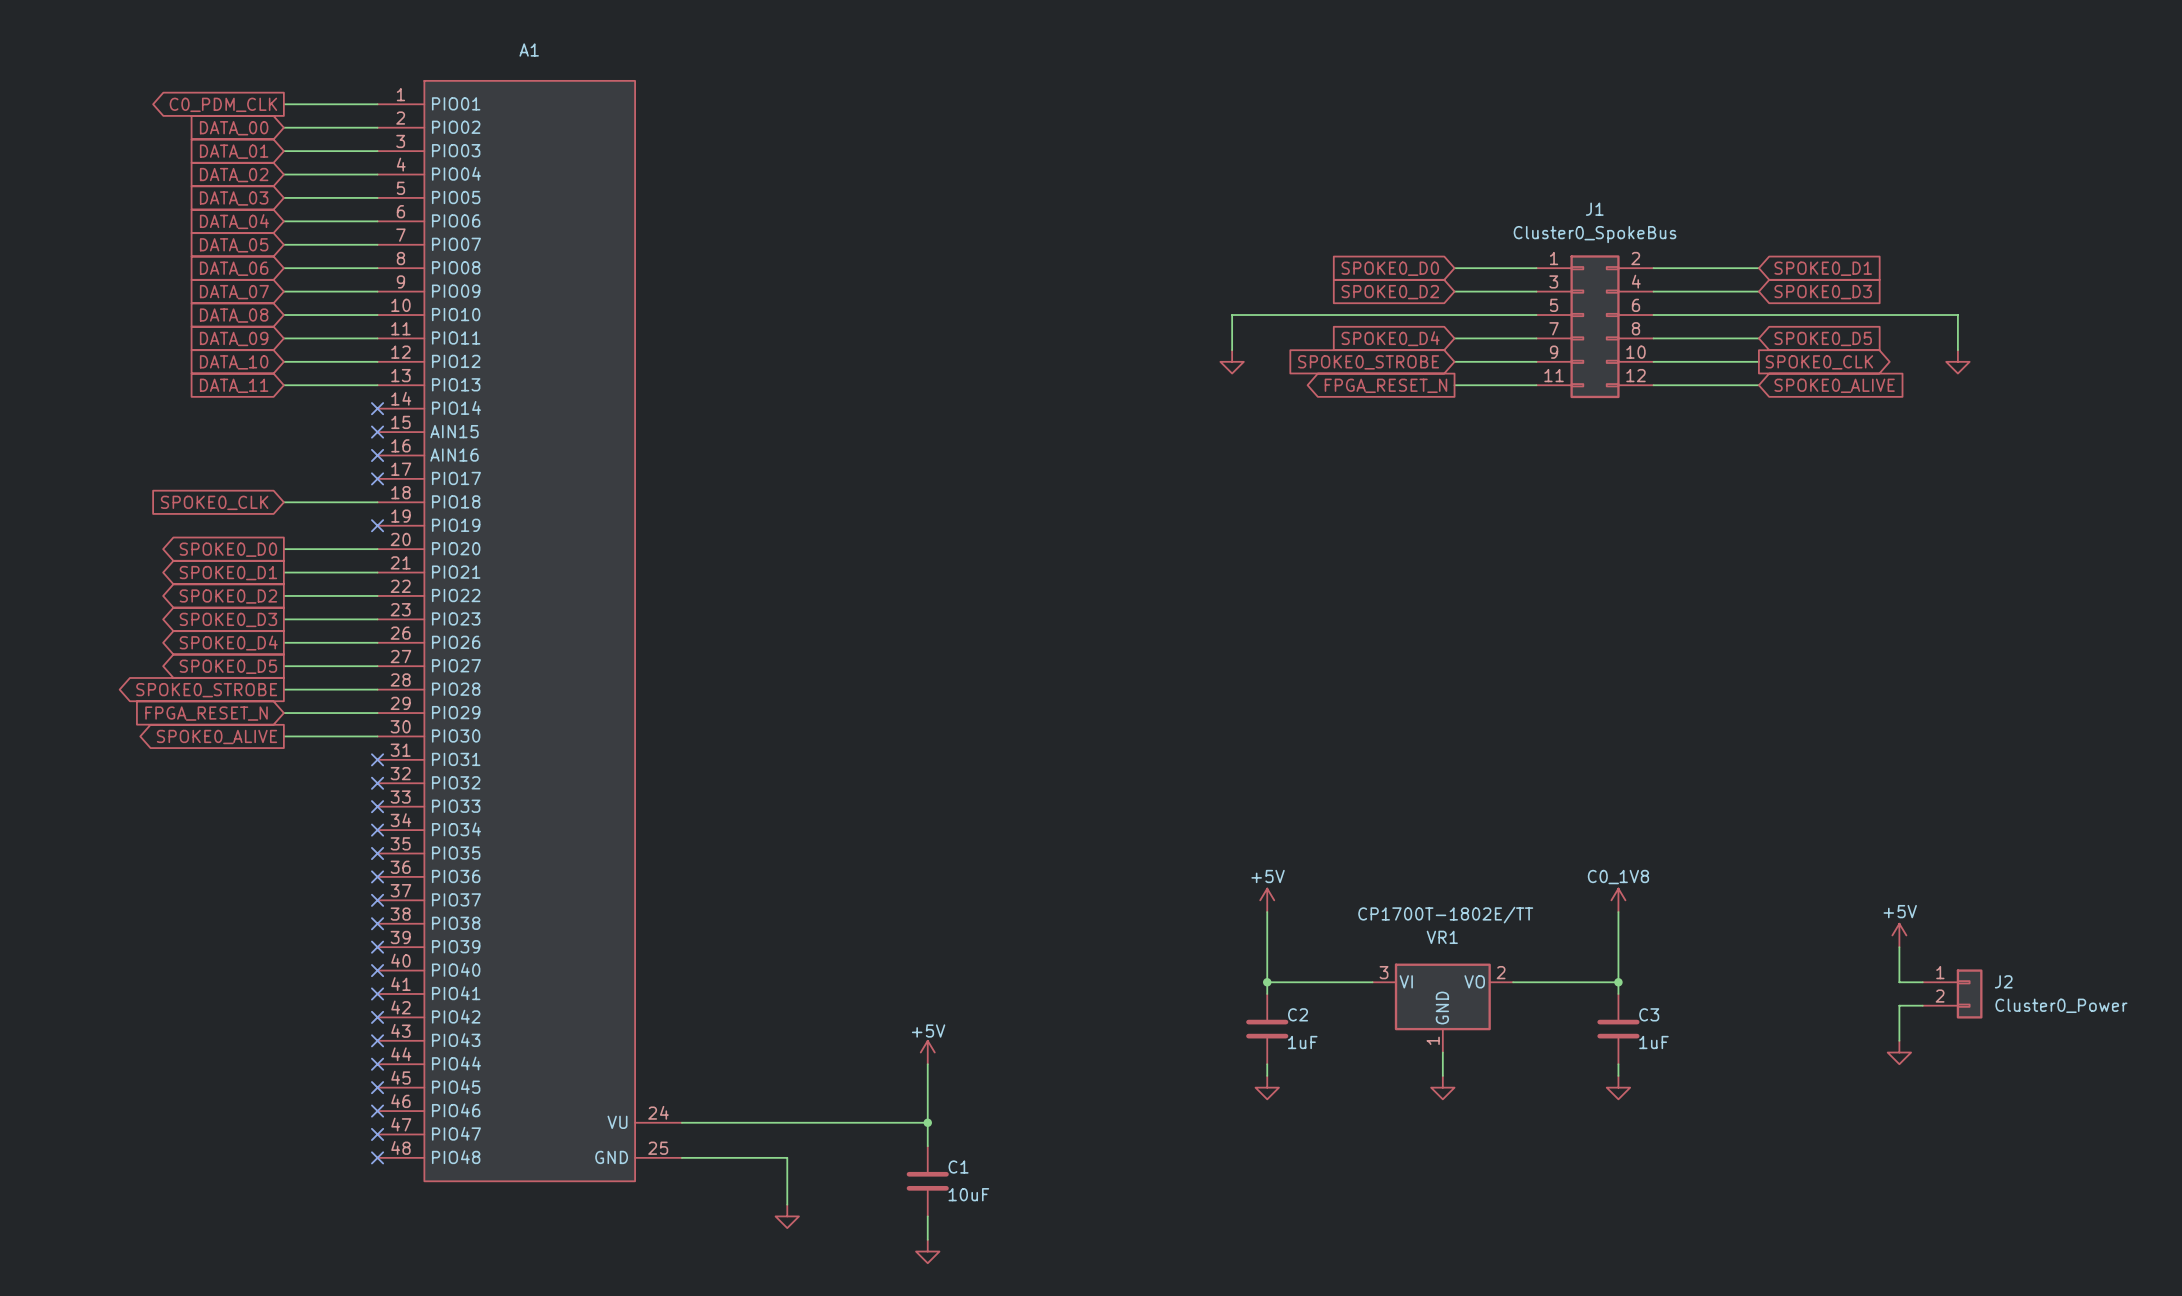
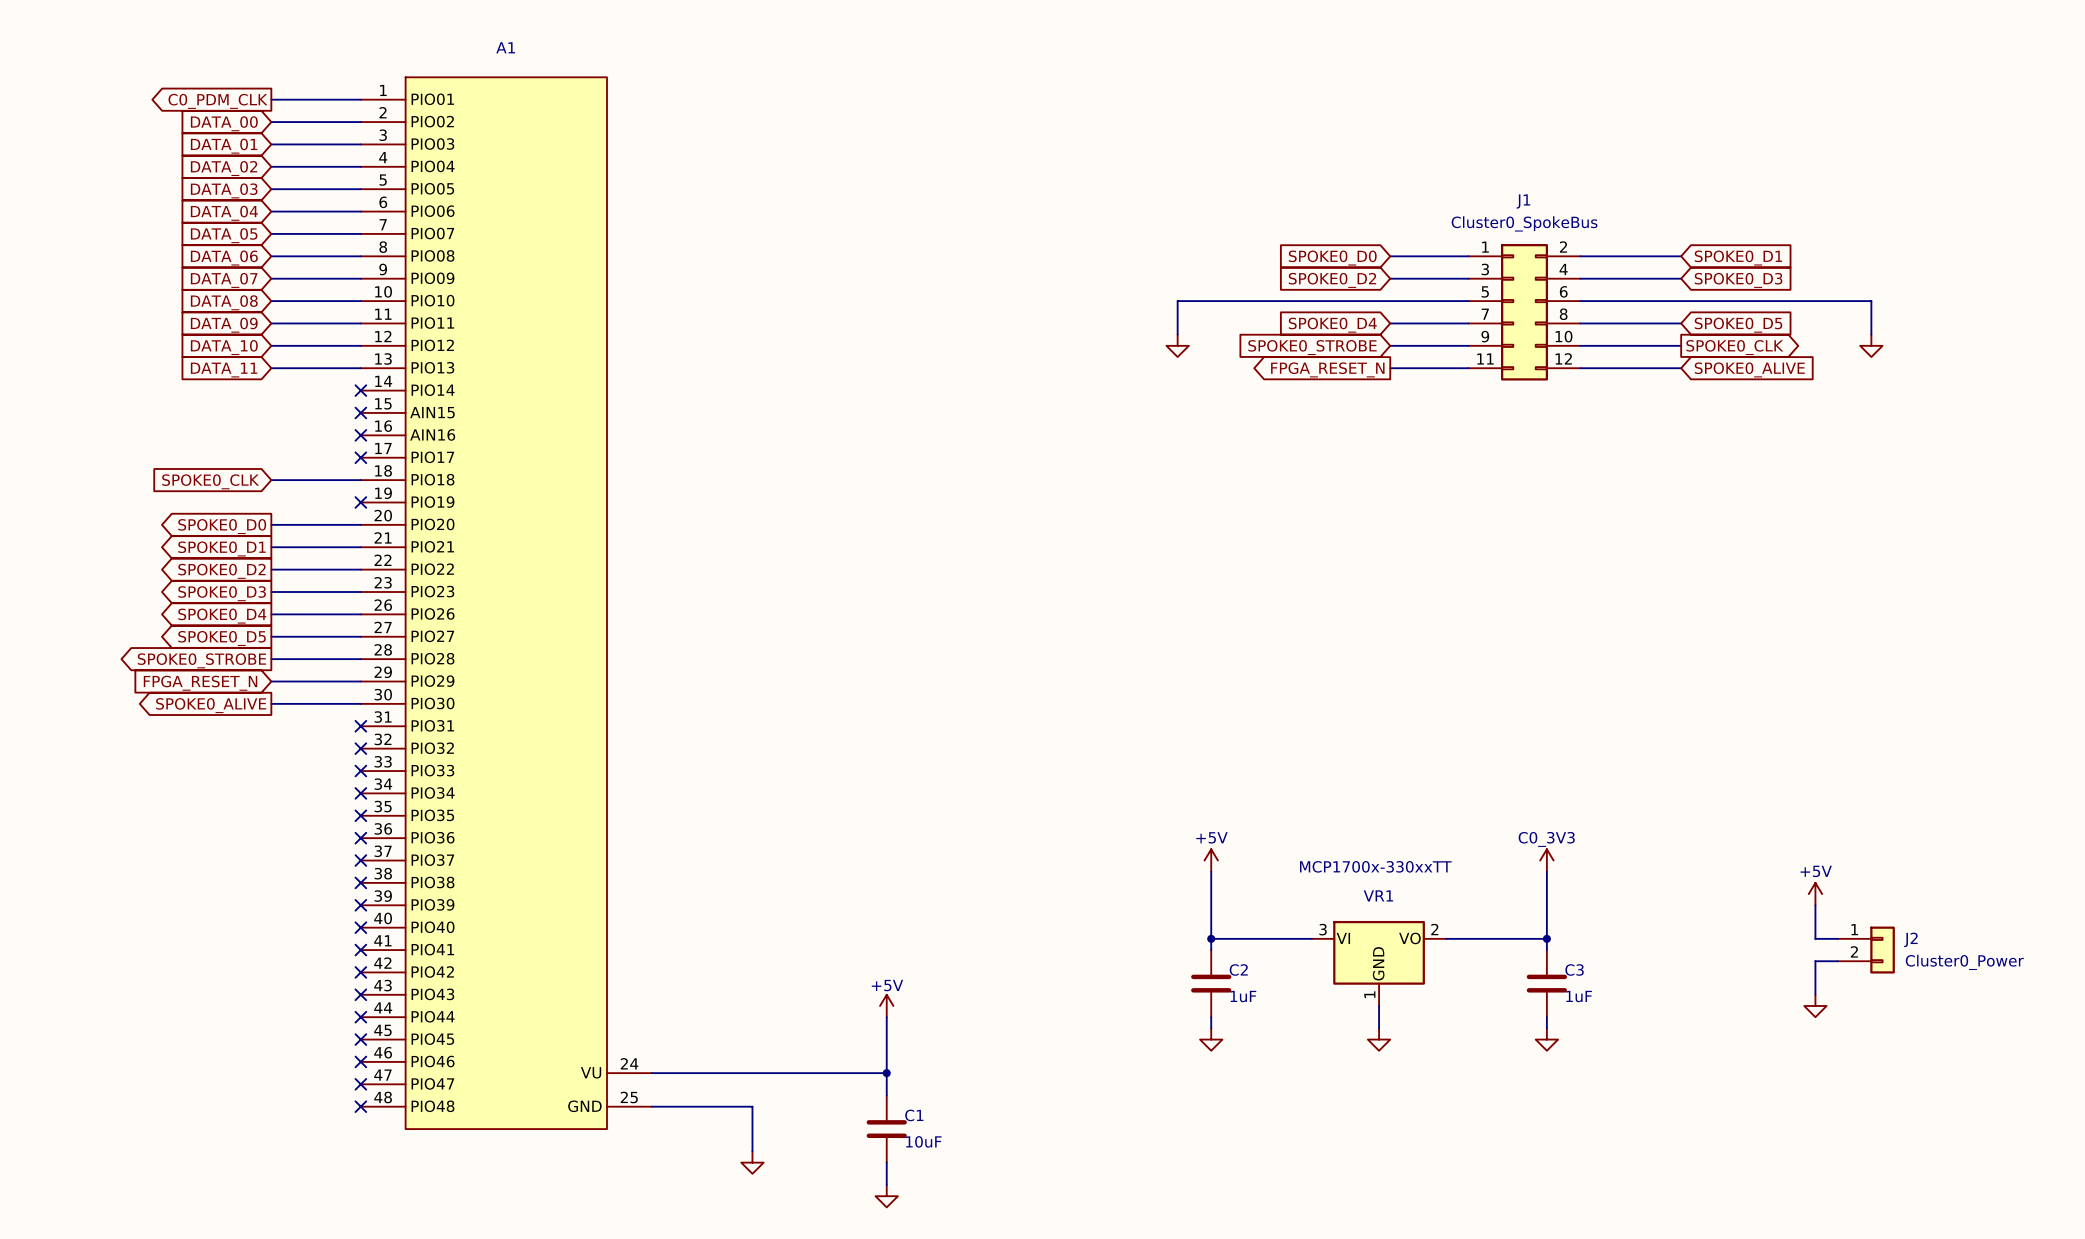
power symbol: C0_1V8 (1618, 900) -> C0_3V3 (1546, 860)
VR1 value: CP1700T-1802E/TT (1445, 915) -> MCP1700x-330xxTT (1375, 866)

